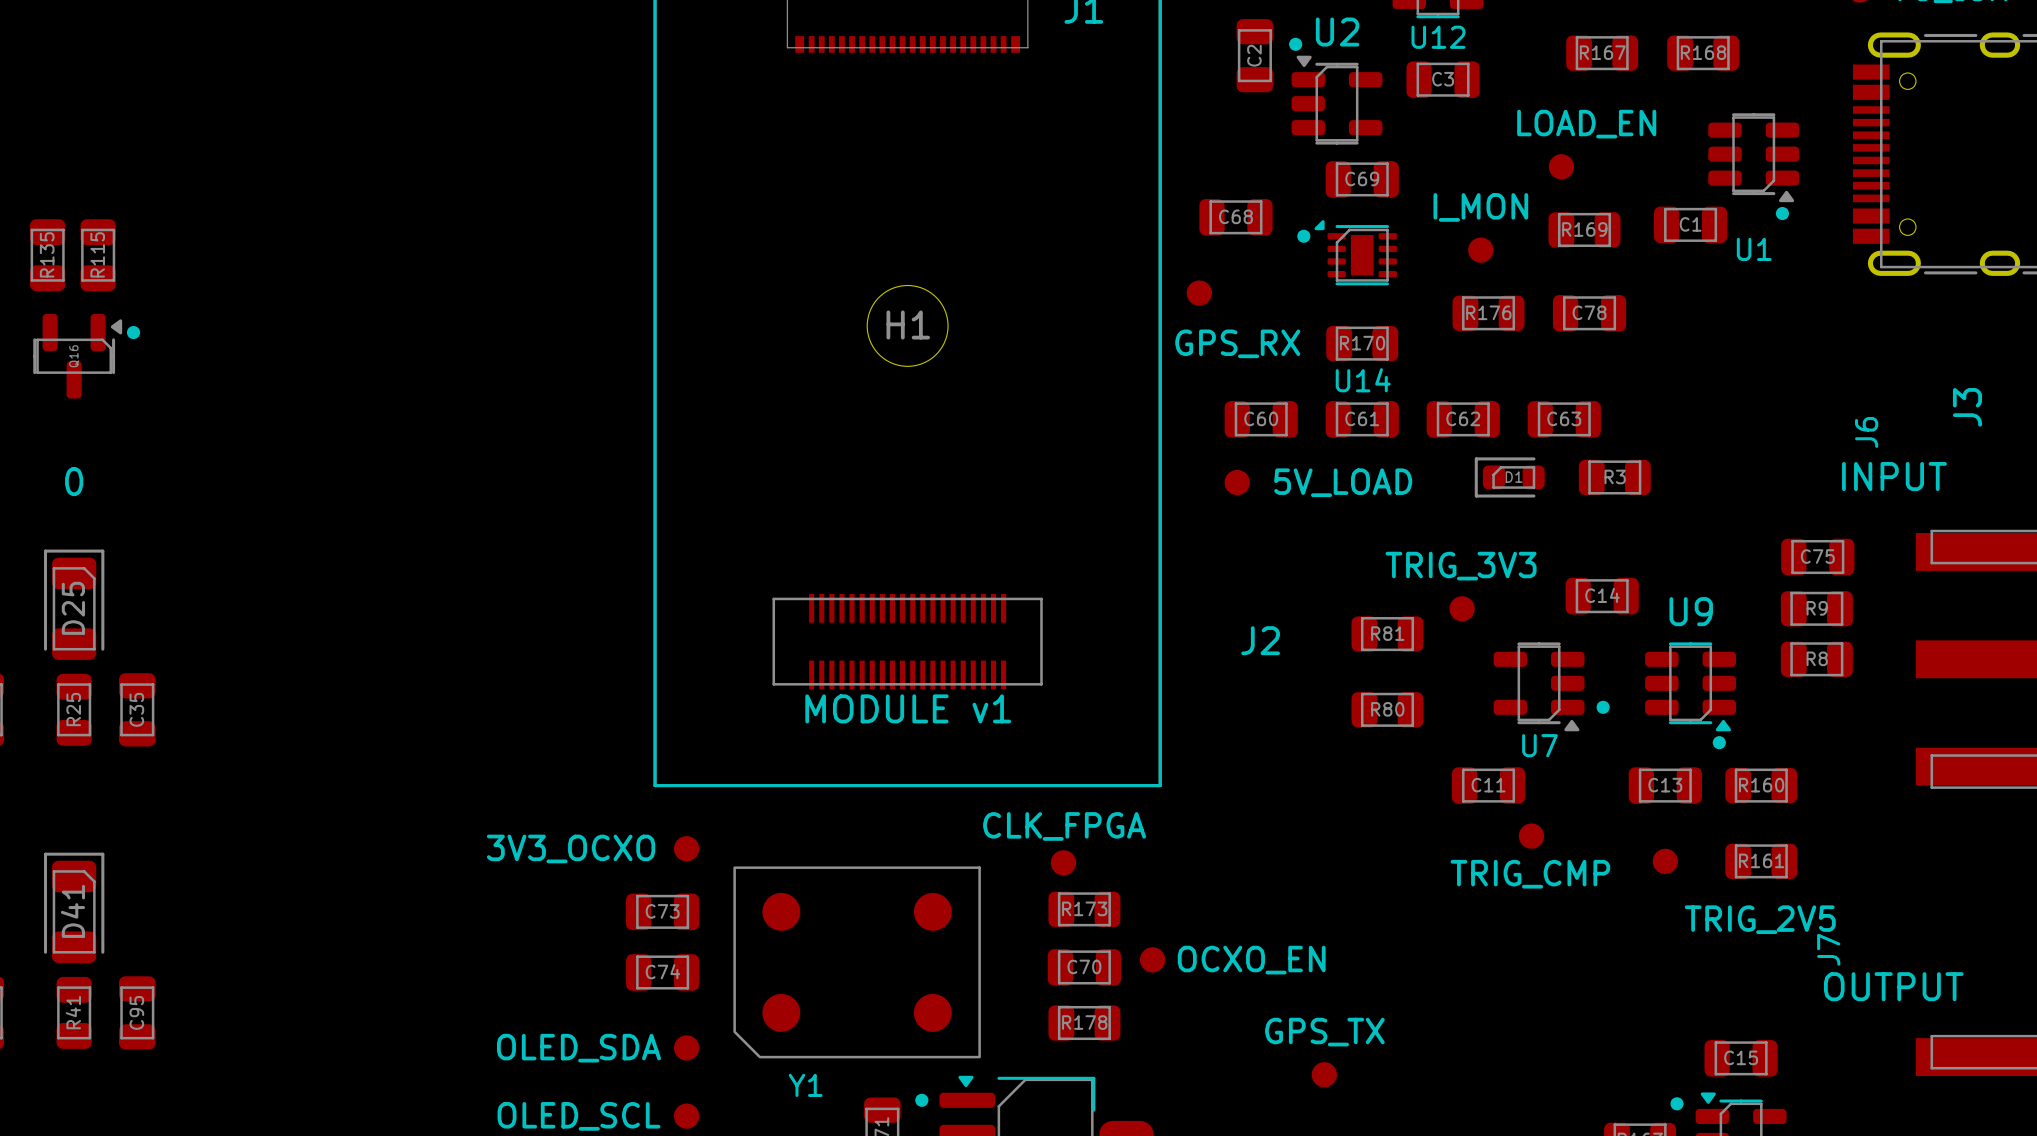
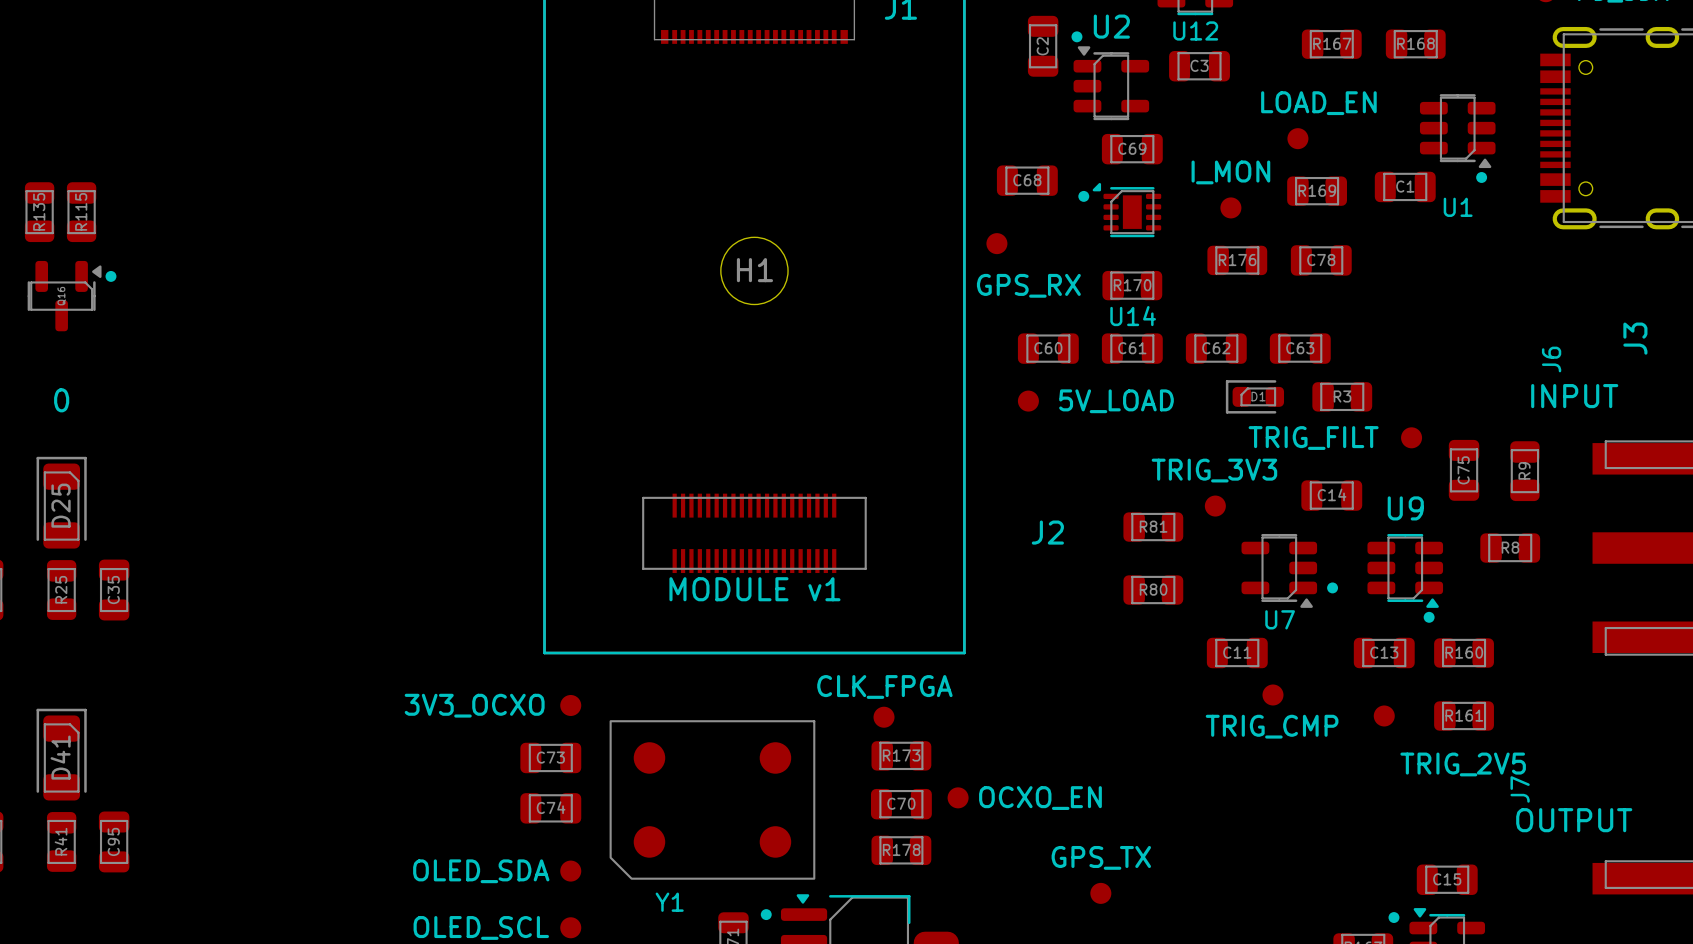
part: none -> TRIG_FILT (1411, 437)
C75 rotation: 0° (1817, 557) -> 90° clockwise (1464, 470)
C75 position: (1817, 557) -> (1464, 470)
R9 rotation: 0° (1816, 608) -> 90° clockwise (1524, 471)
R9 position: (1816, 608) -> (1524, 471)

